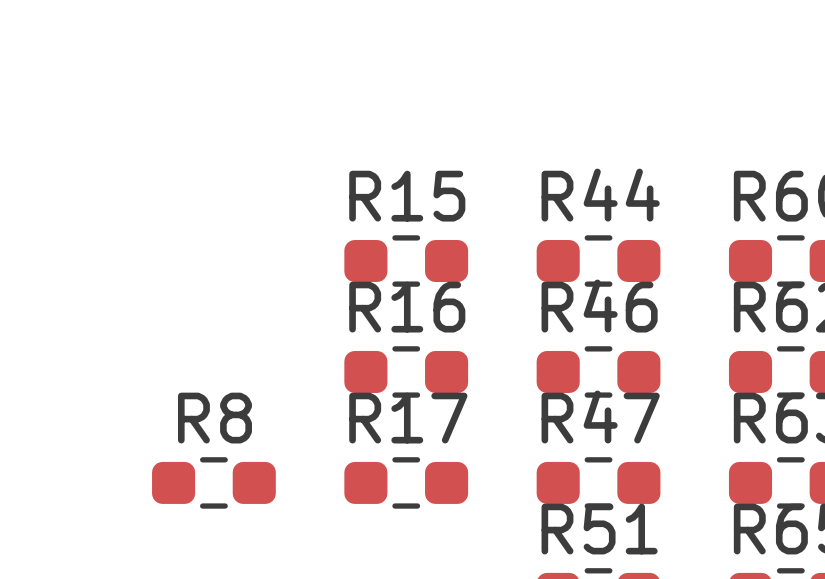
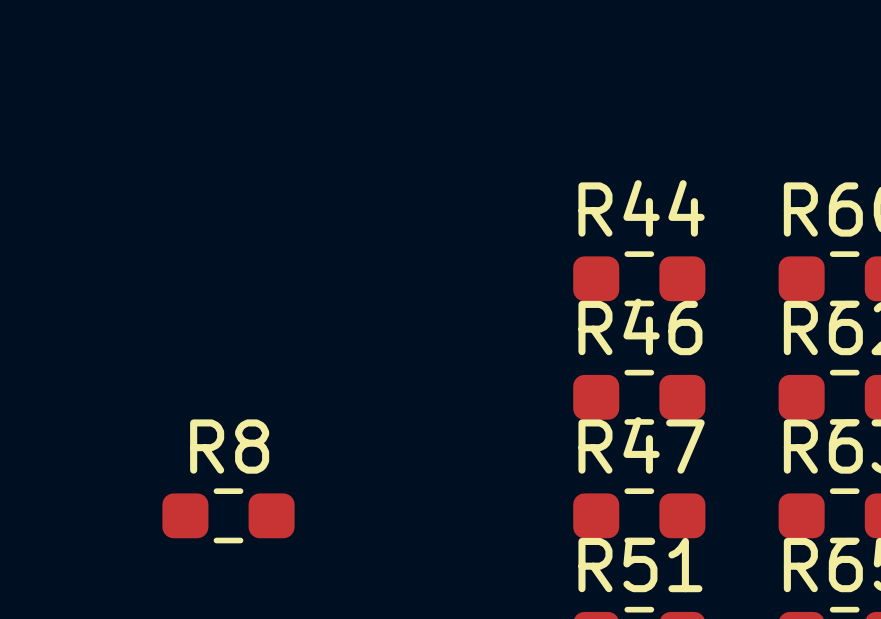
R15: (406, 261) -> none
R16: (406, 371) -> none
R17: (406, 482) -> none

